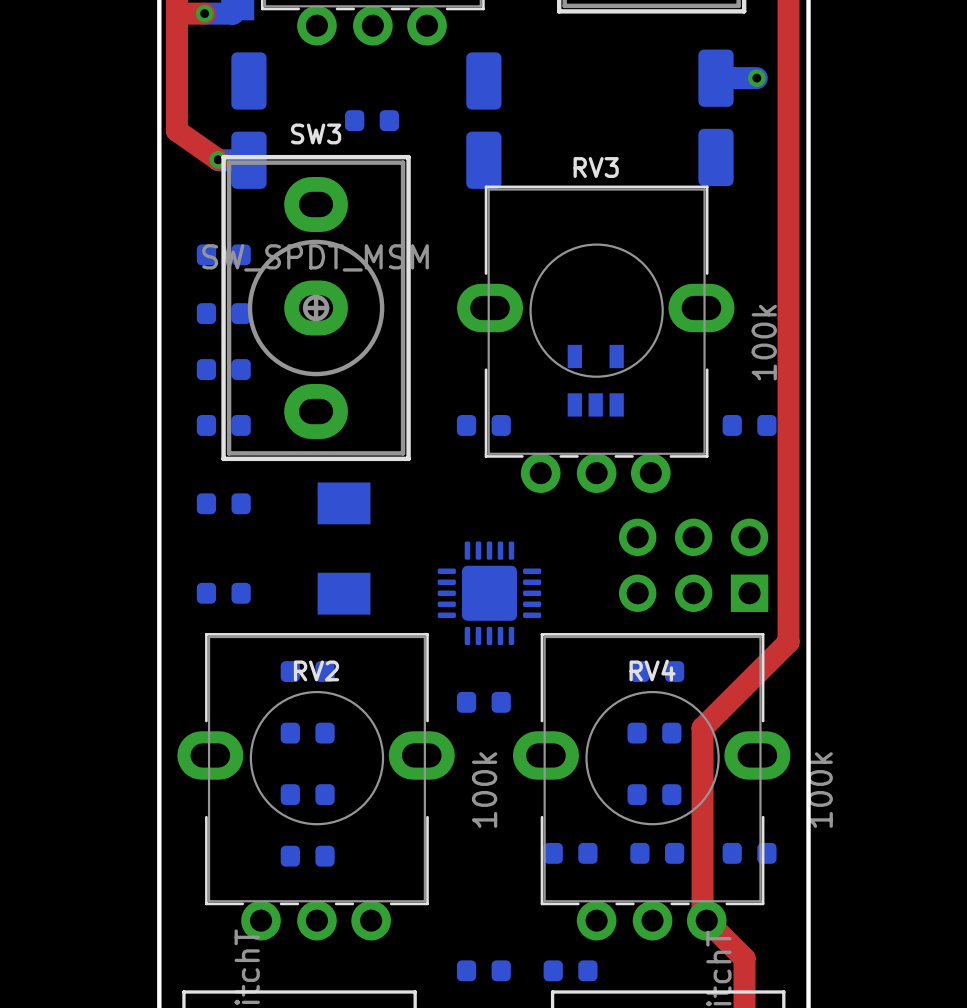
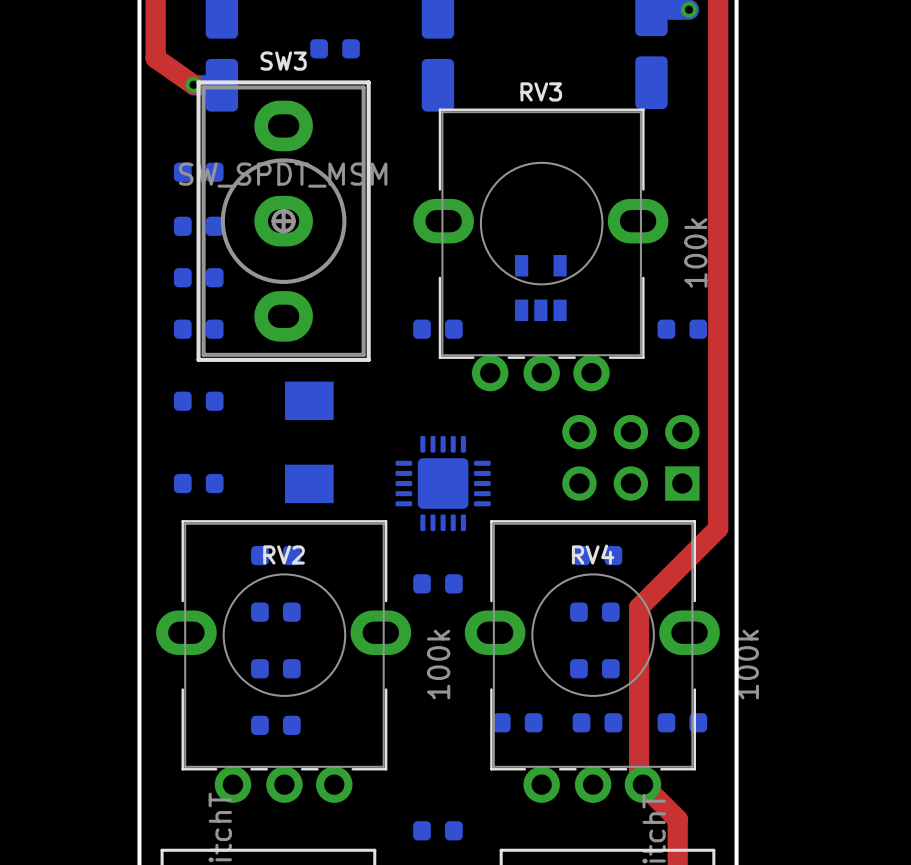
part: (570, 970) -> none

